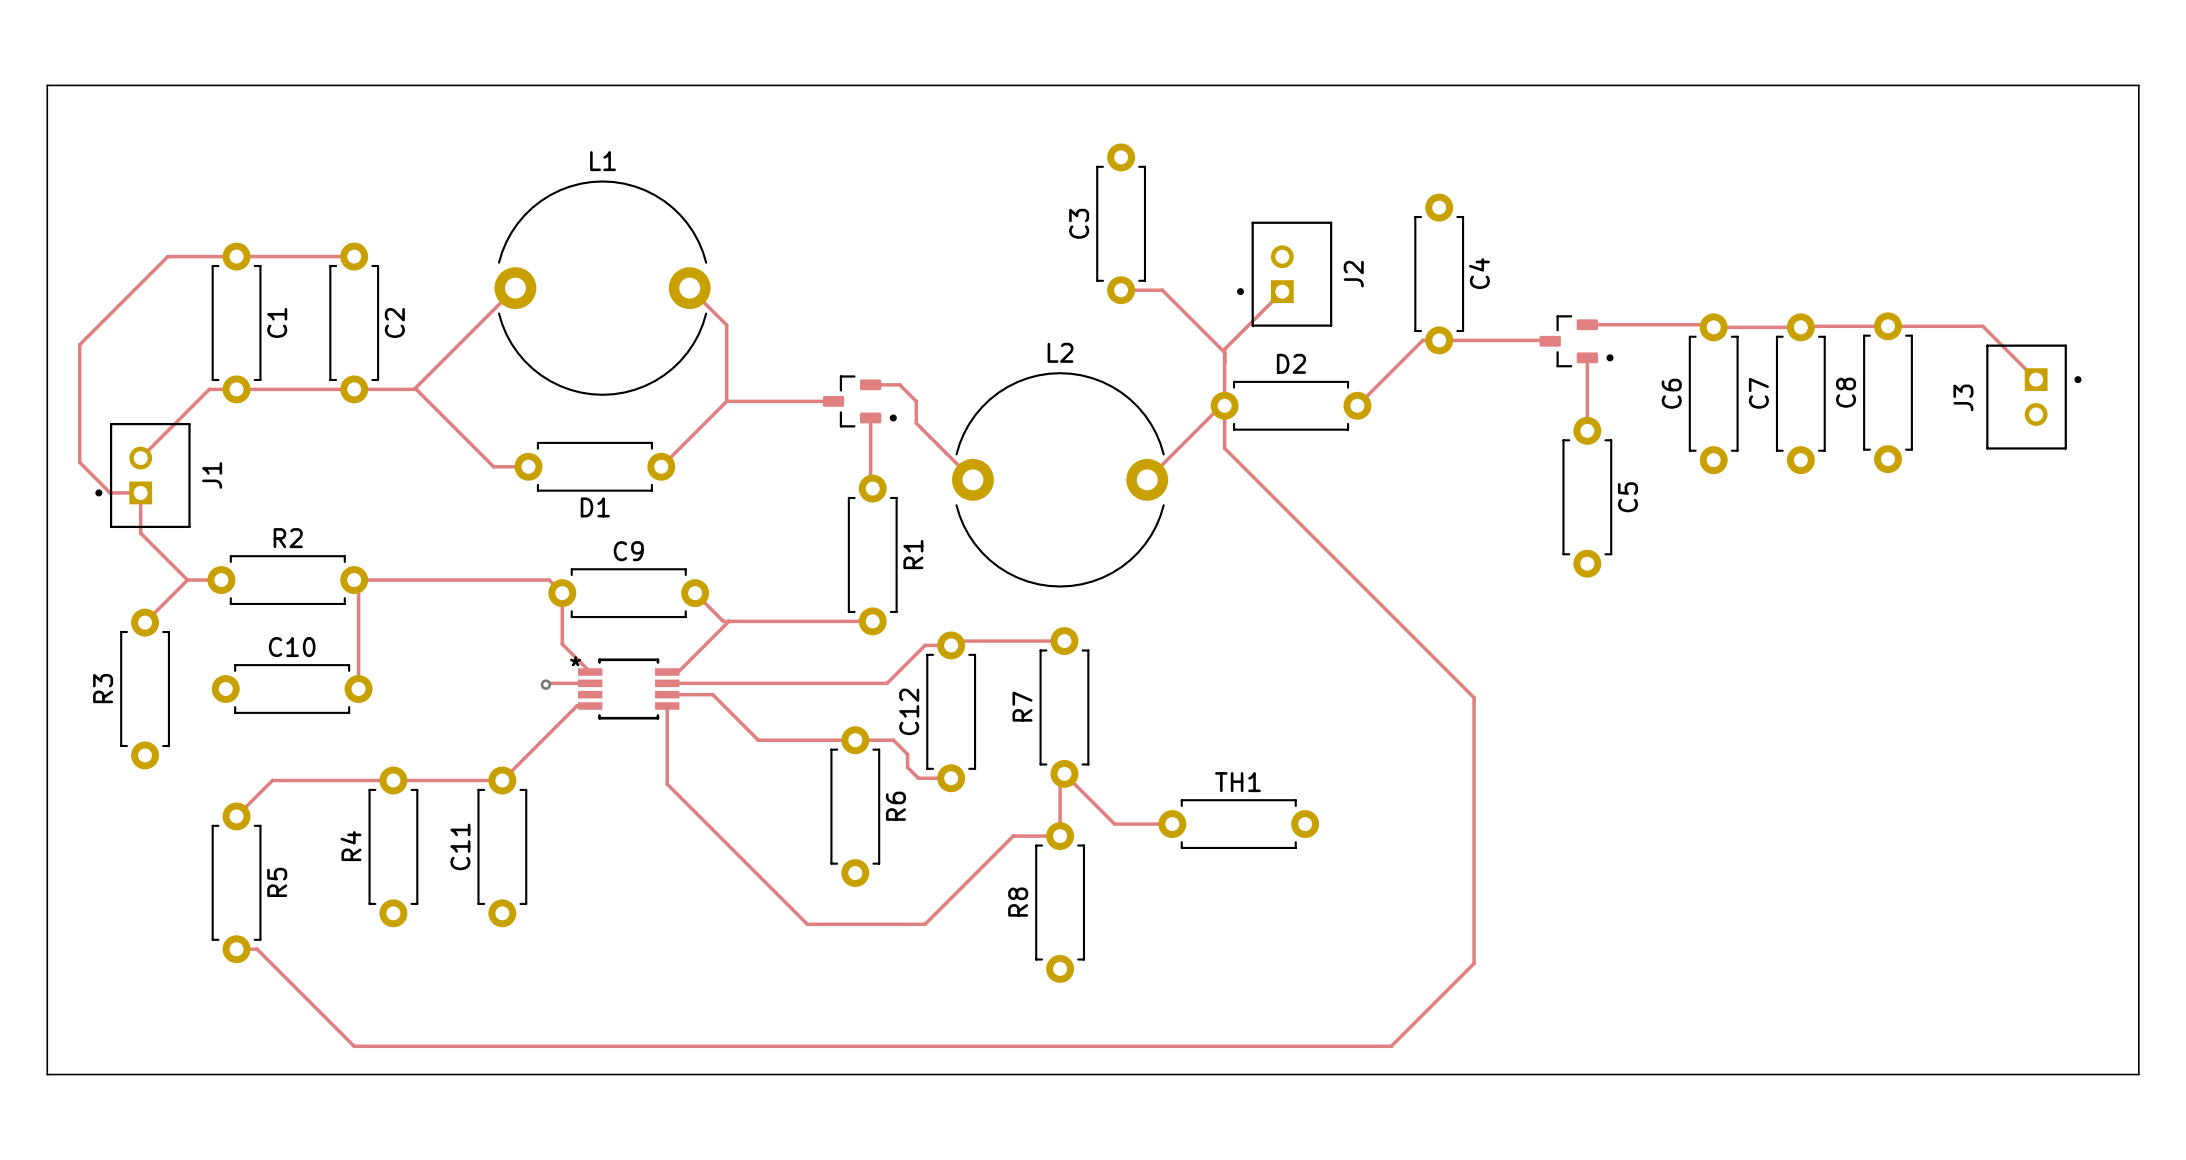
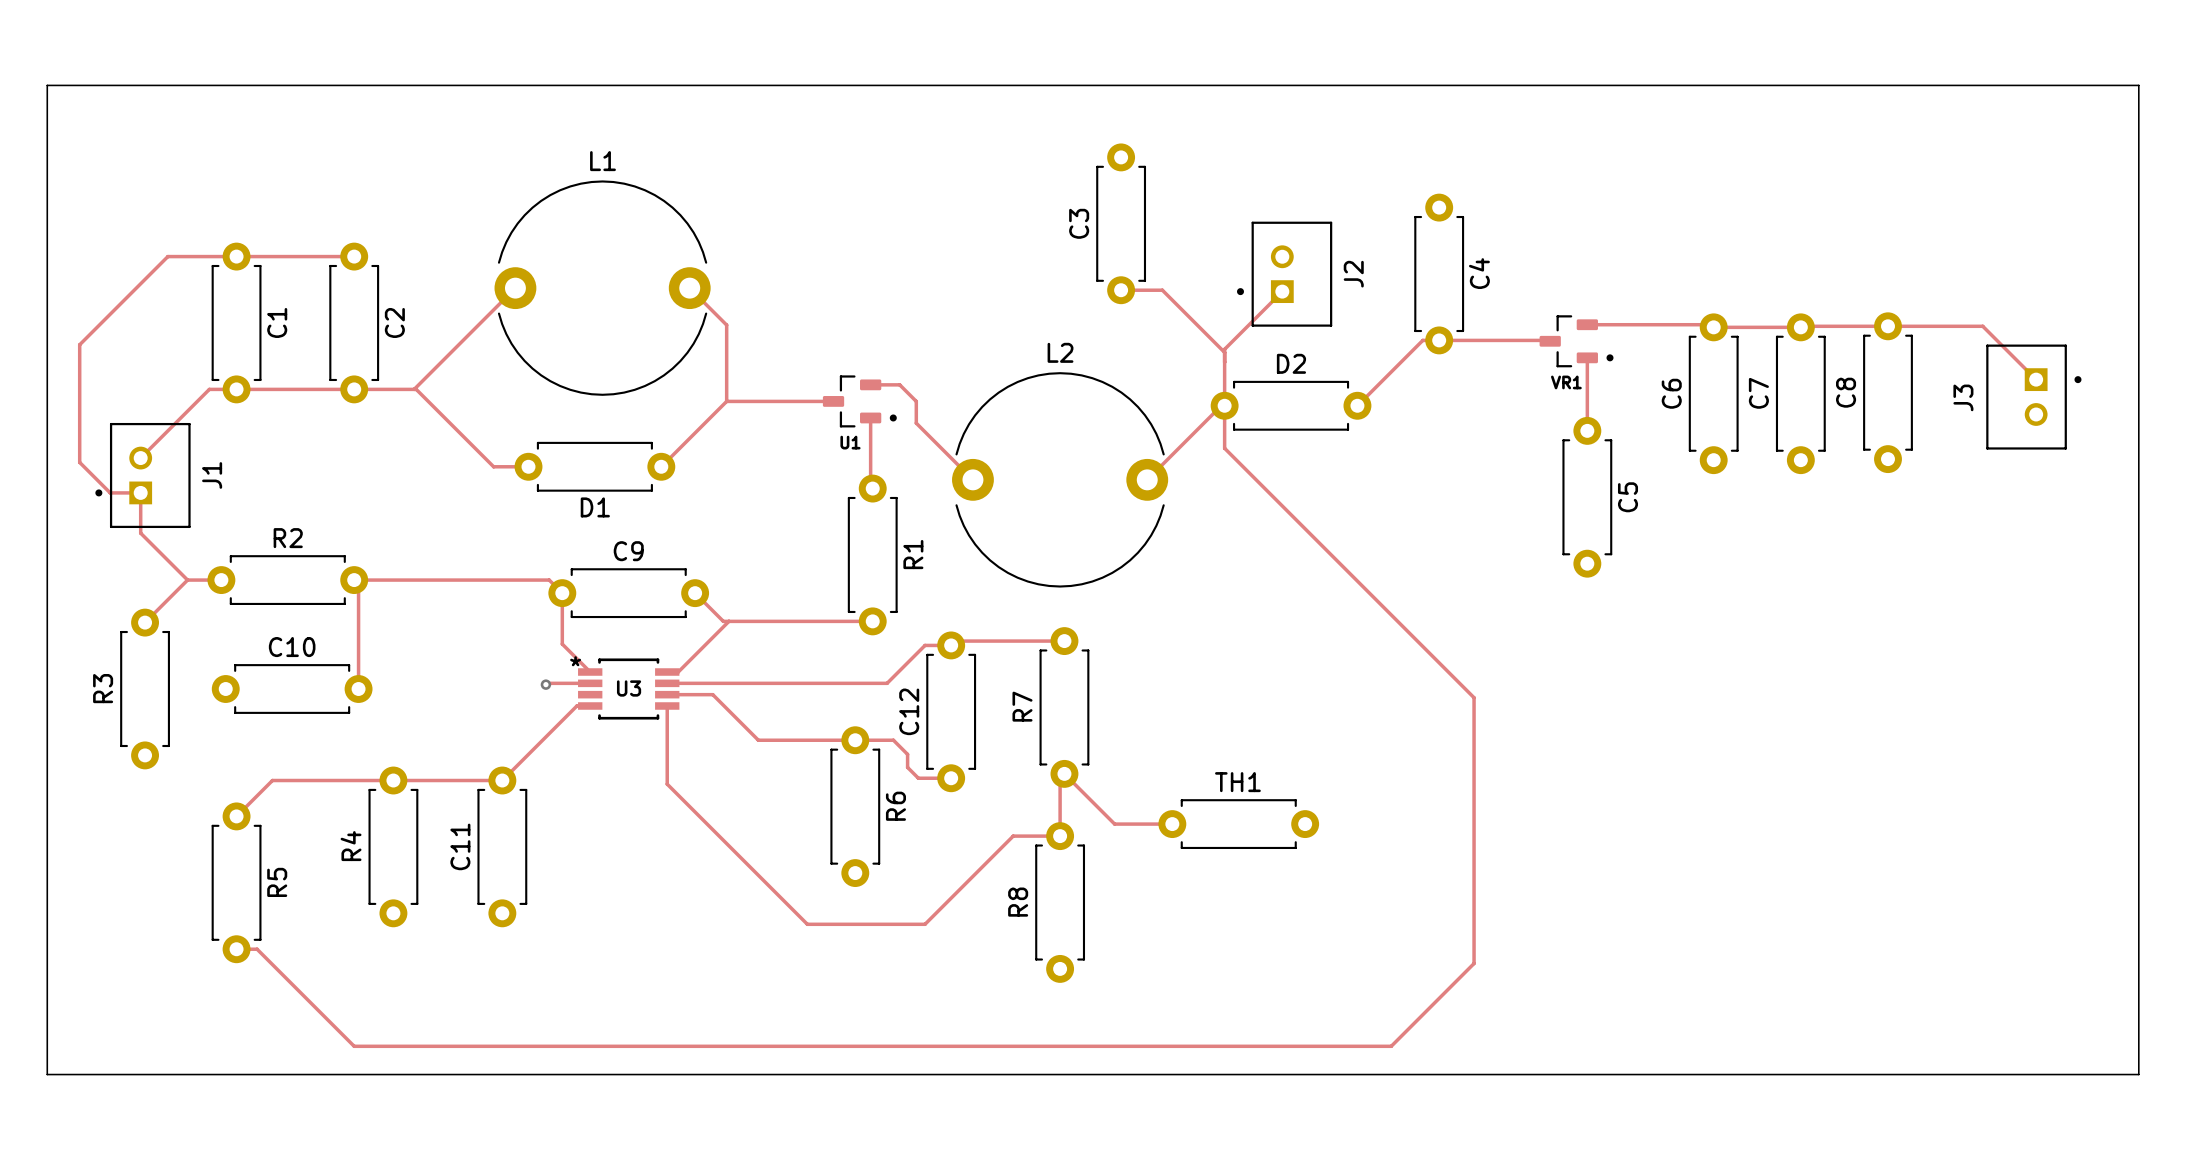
VR1 name: none -> VR1 (1566, 382)
U1 name: none -> U1 (850, 442)
U3 name: none -> U3 (629, 688)

